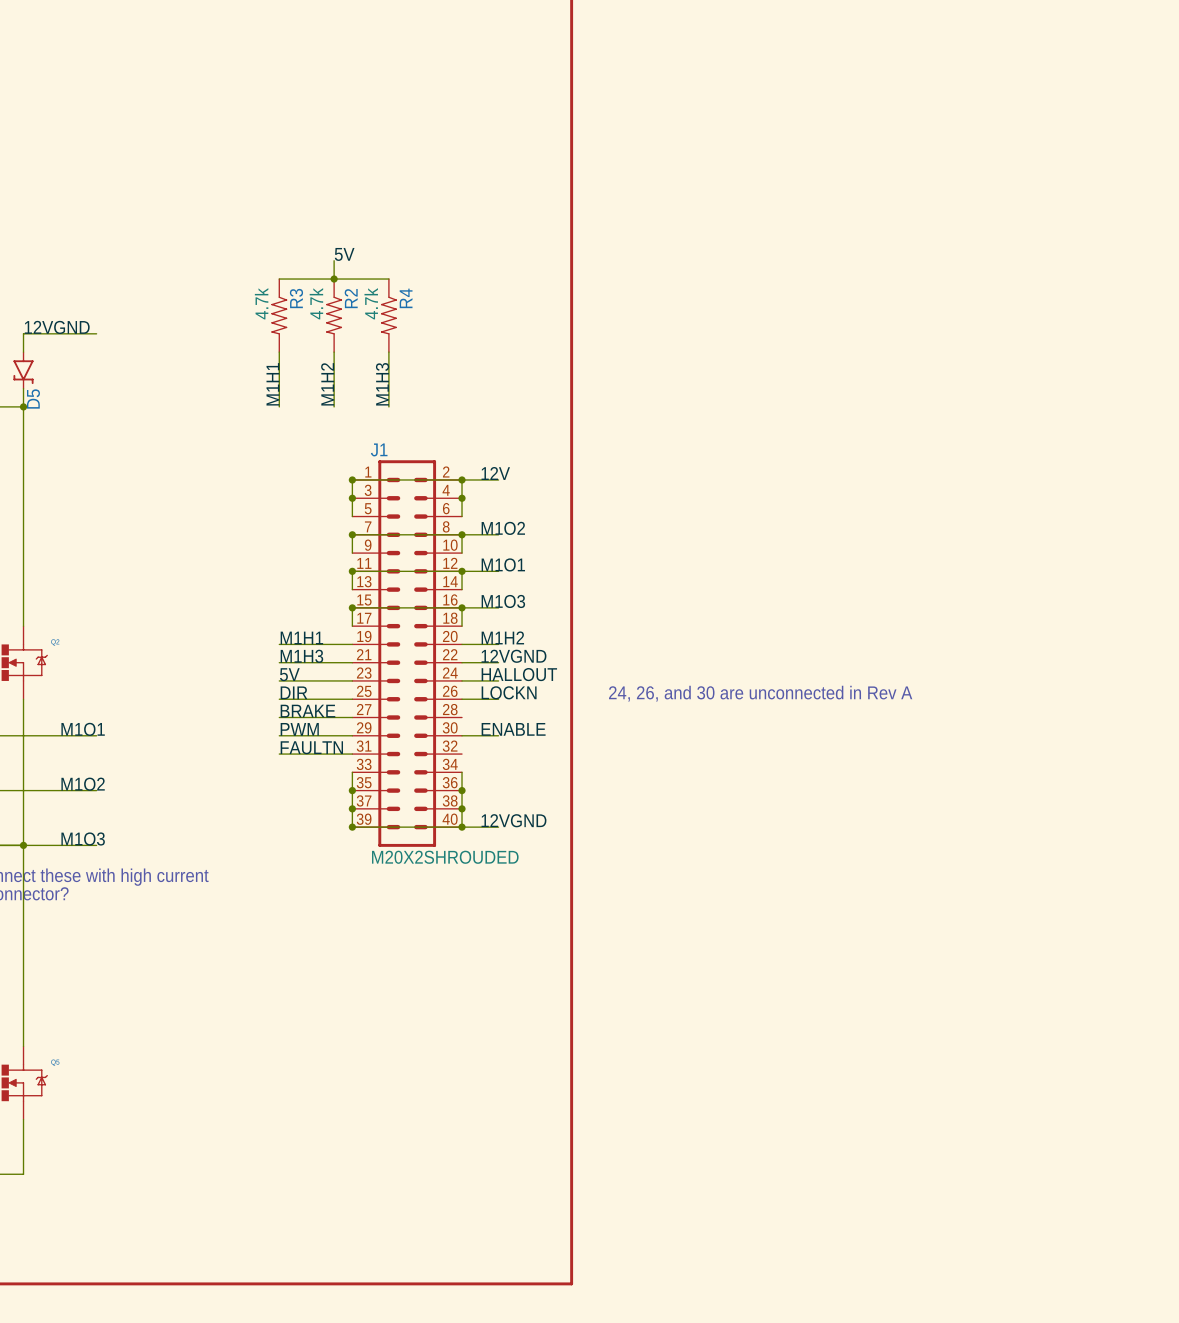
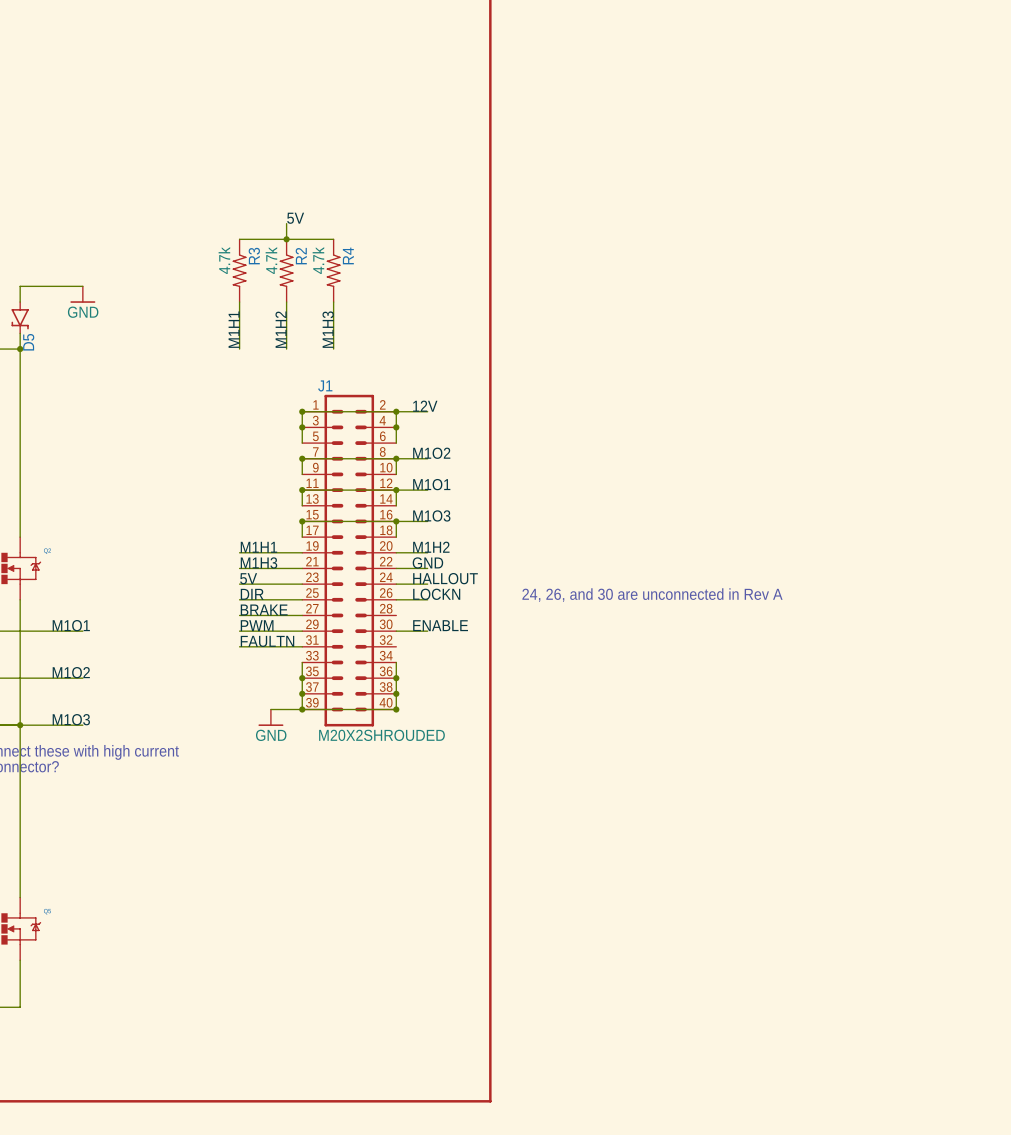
label: 12VGND (57, 327) -> none
power symbol: none -> GND (82, 294)
label: 12VGND (513, 656) -> GND (427, 562)
label: 12VGND (513, 820) -> none
wire: (462, 827) (498, 827) -> (270, 709) (302, 709)
power symbol: none -> GND (270, 717)

